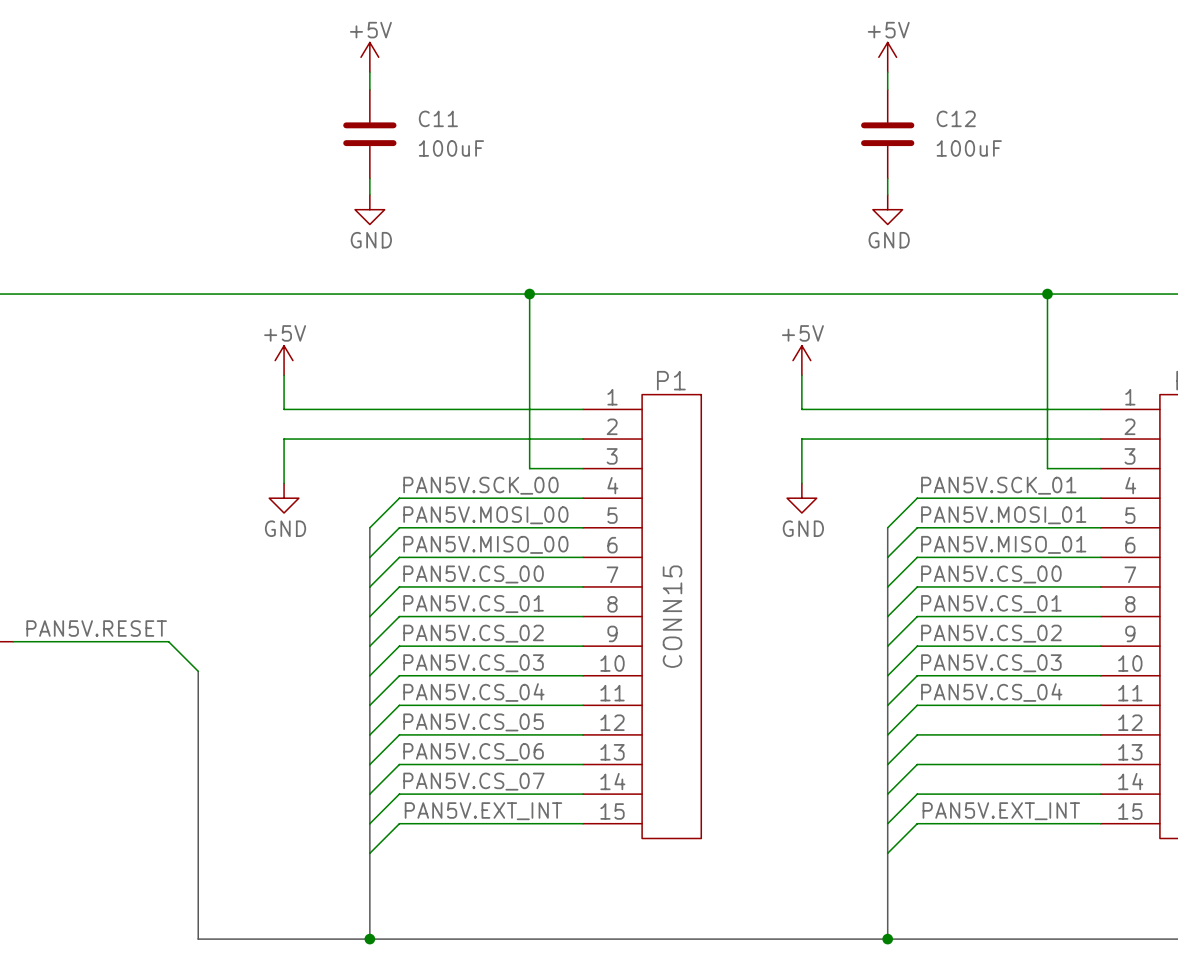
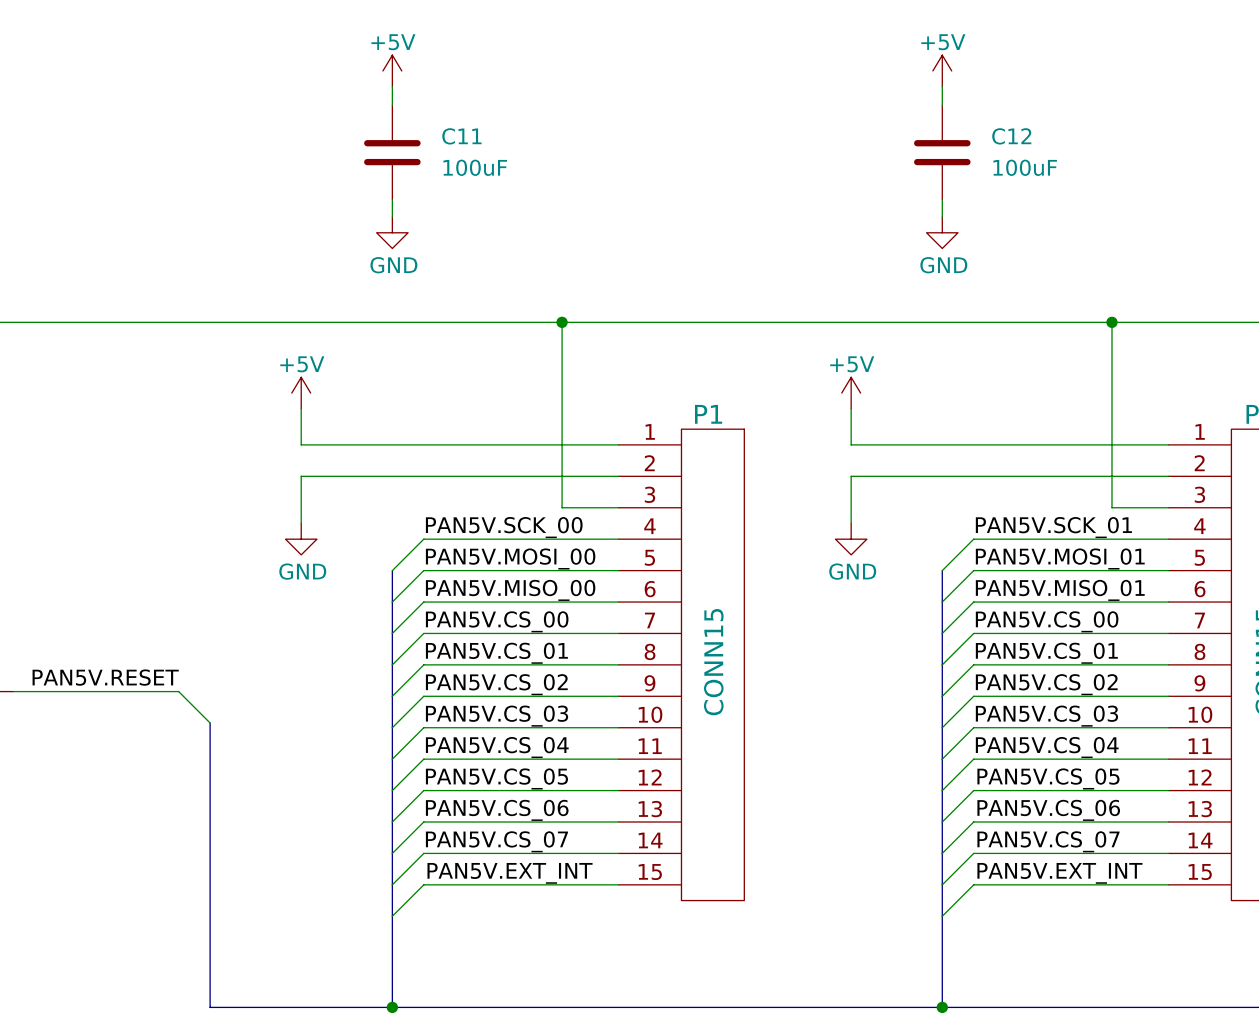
label: none -> PAN5V.CS_05 (1048, 778)
label: none -> PAN5V.CS_06 (1048, 810)
label: none -> PAN5V.CS_07 (1048, 841)

